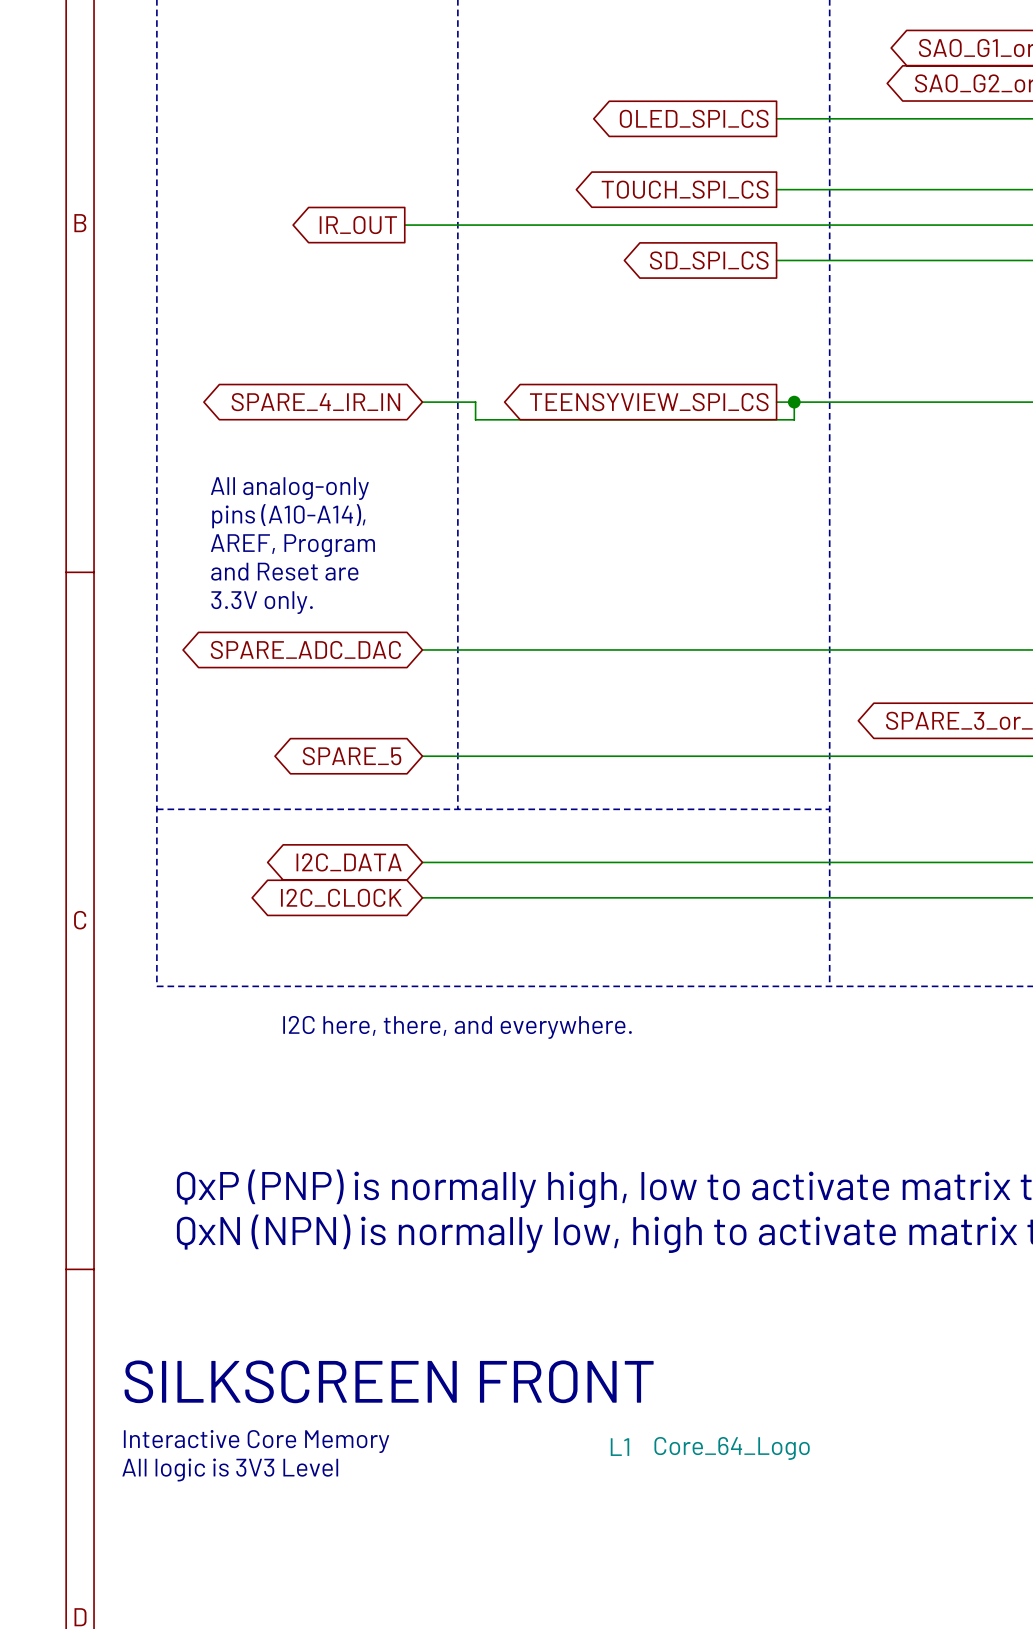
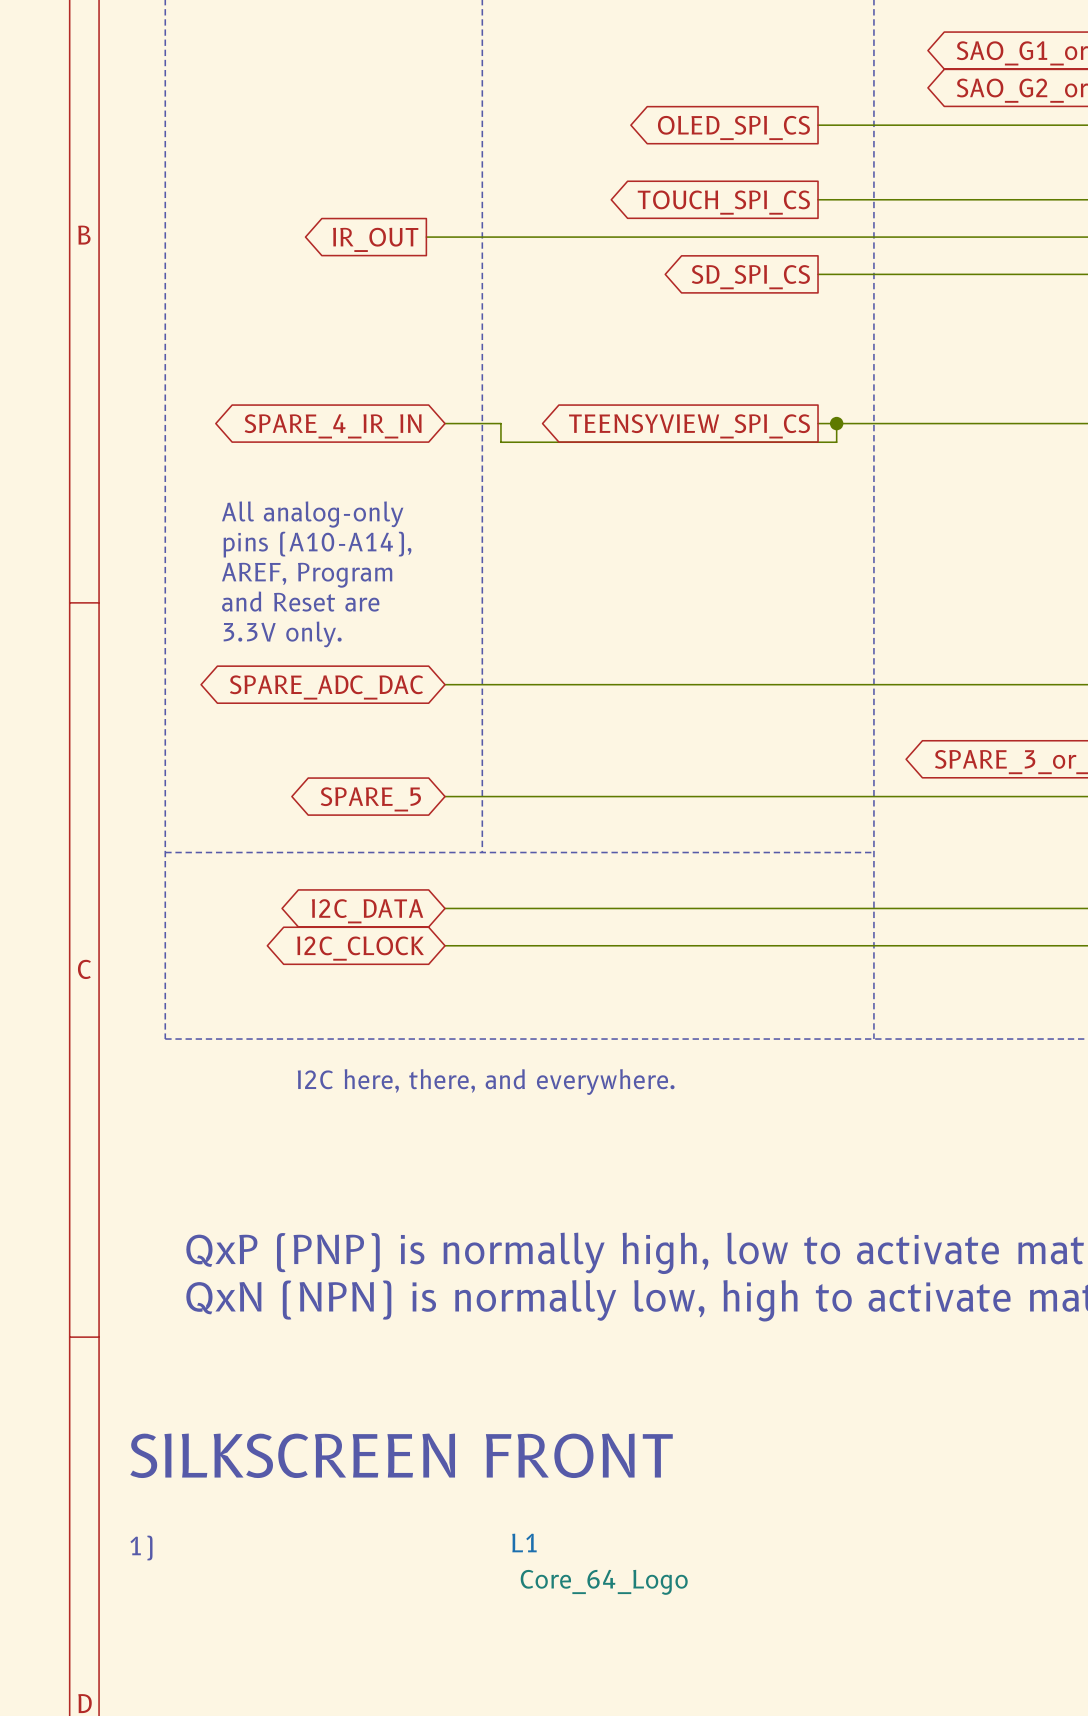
text: Interactive Core Memory (256, 1441) -> none
L1 name position: L1 (619, 1447) -> L1 (524, 1542)
L1 position: (710, 1448) -> (599, 1564)
L1 value position: Core_64_Logo (732, 1448) -> Core_64_Logo (604, 1582)
text: All logic is 3V3 Level (230, 1470) -> 1) (141, 1548)

